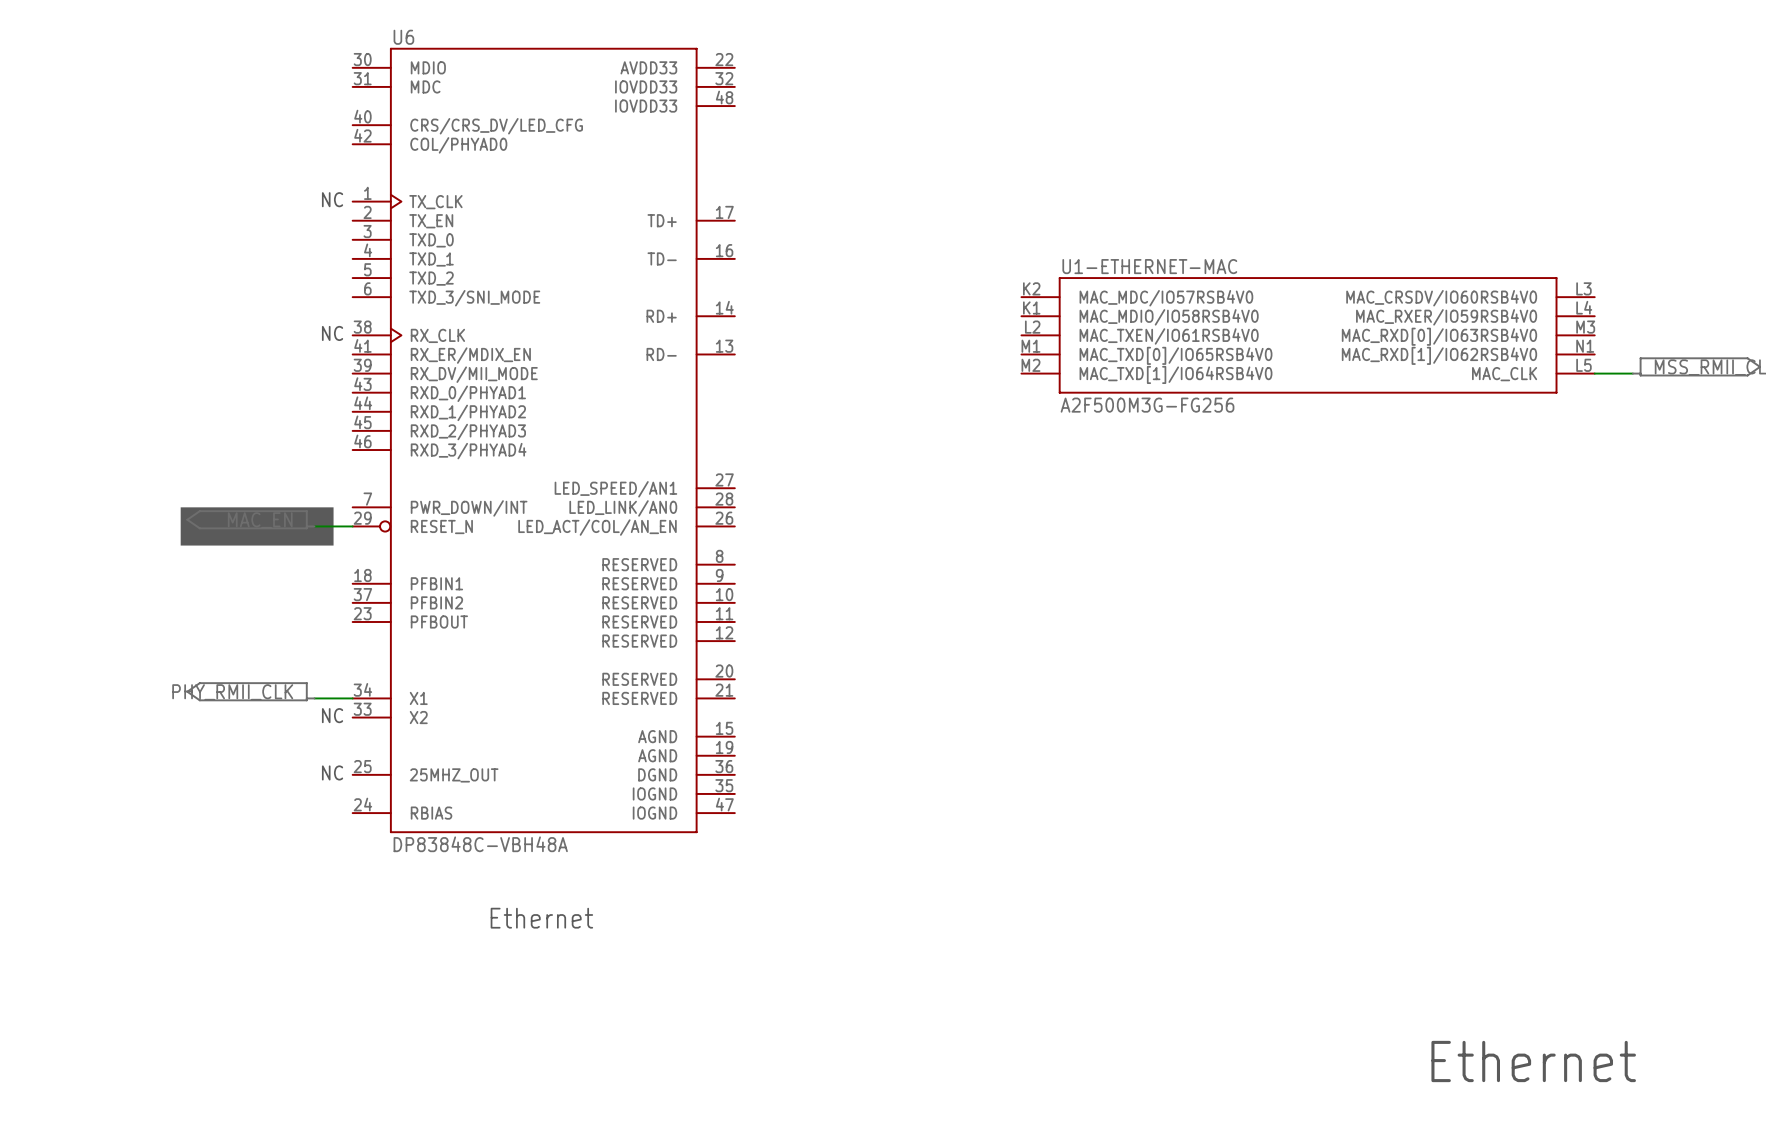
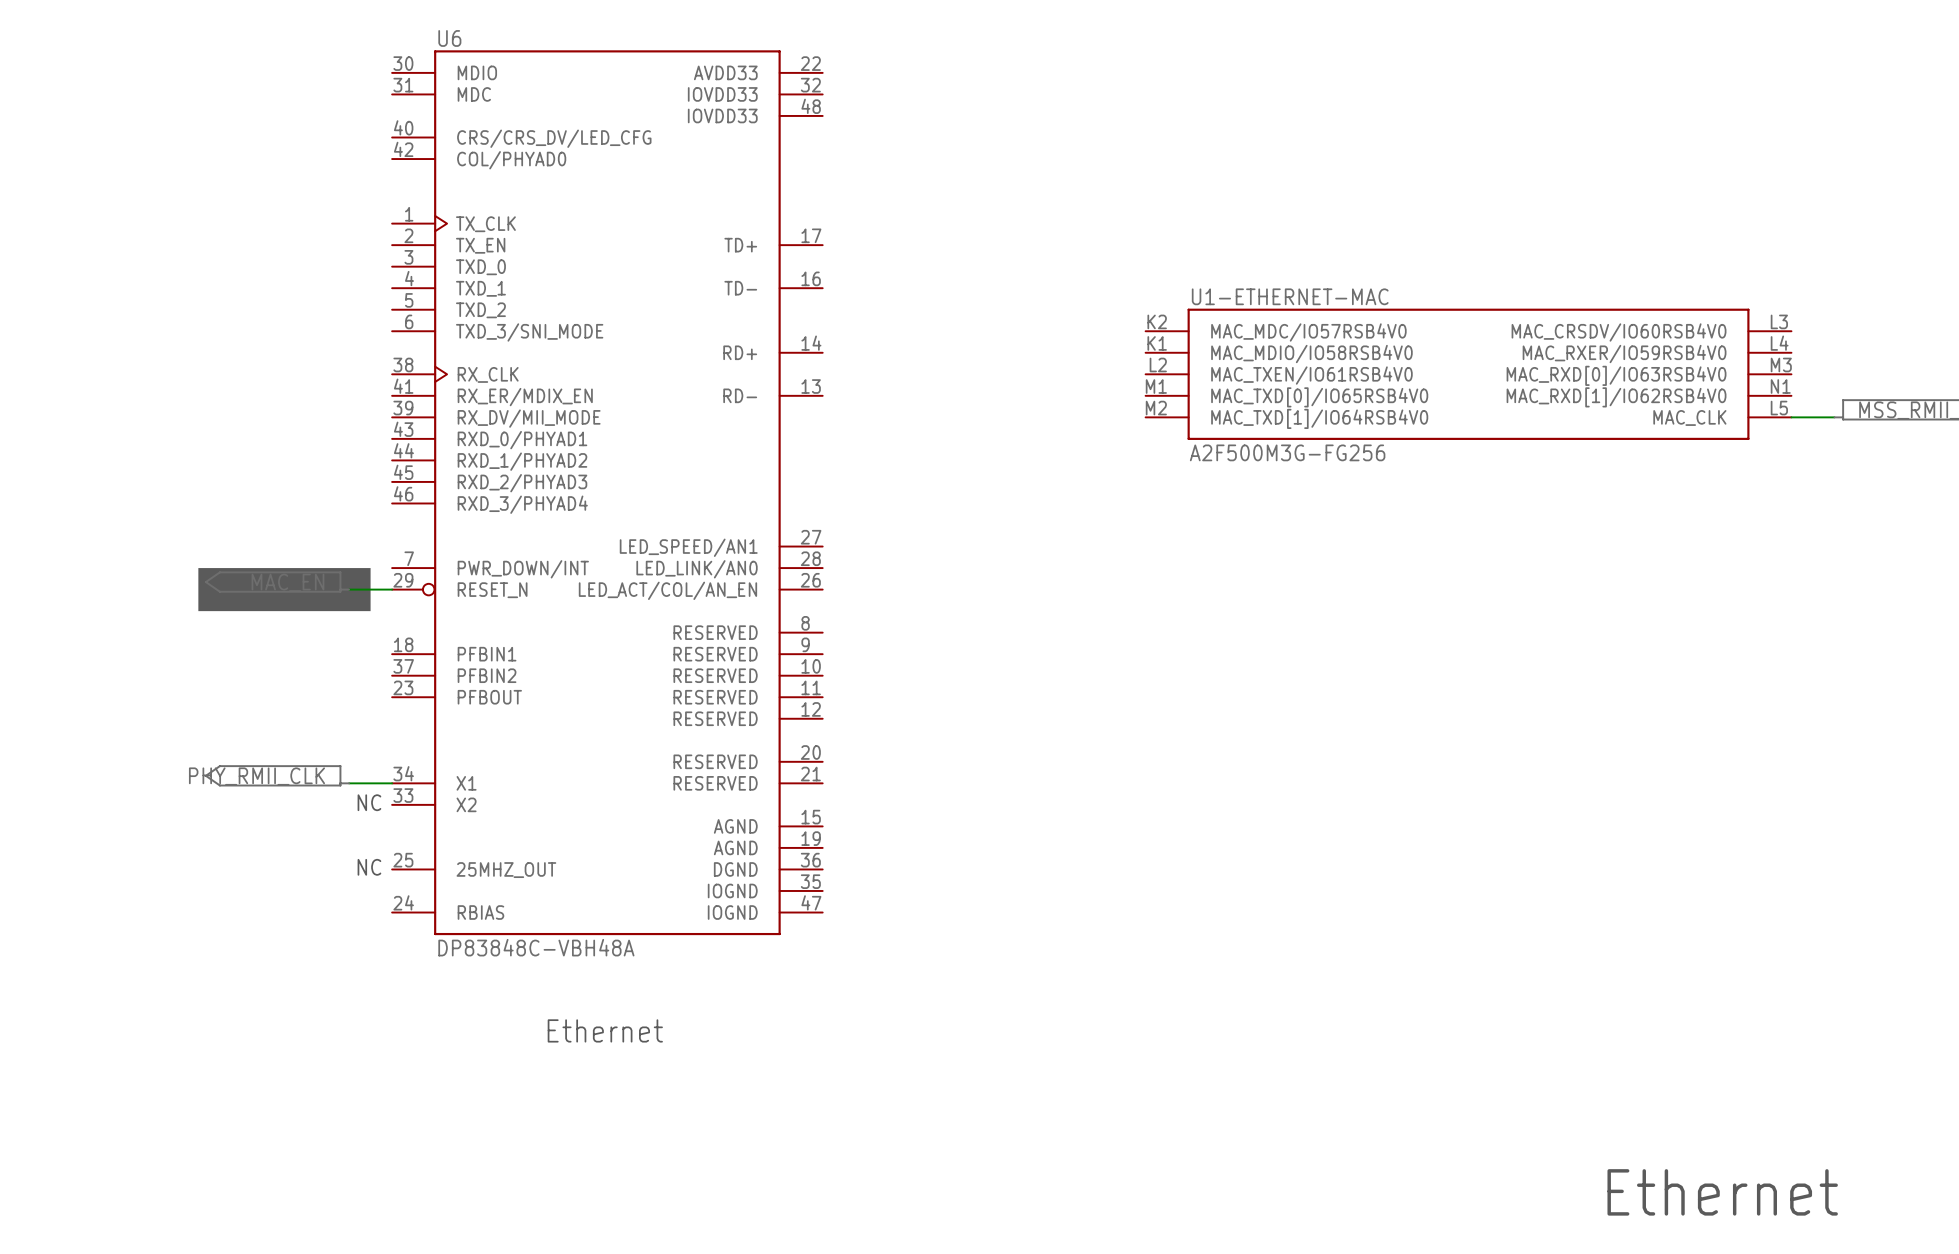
text: NC (332, 199) -> none
text: NC (332, 333) -> none

